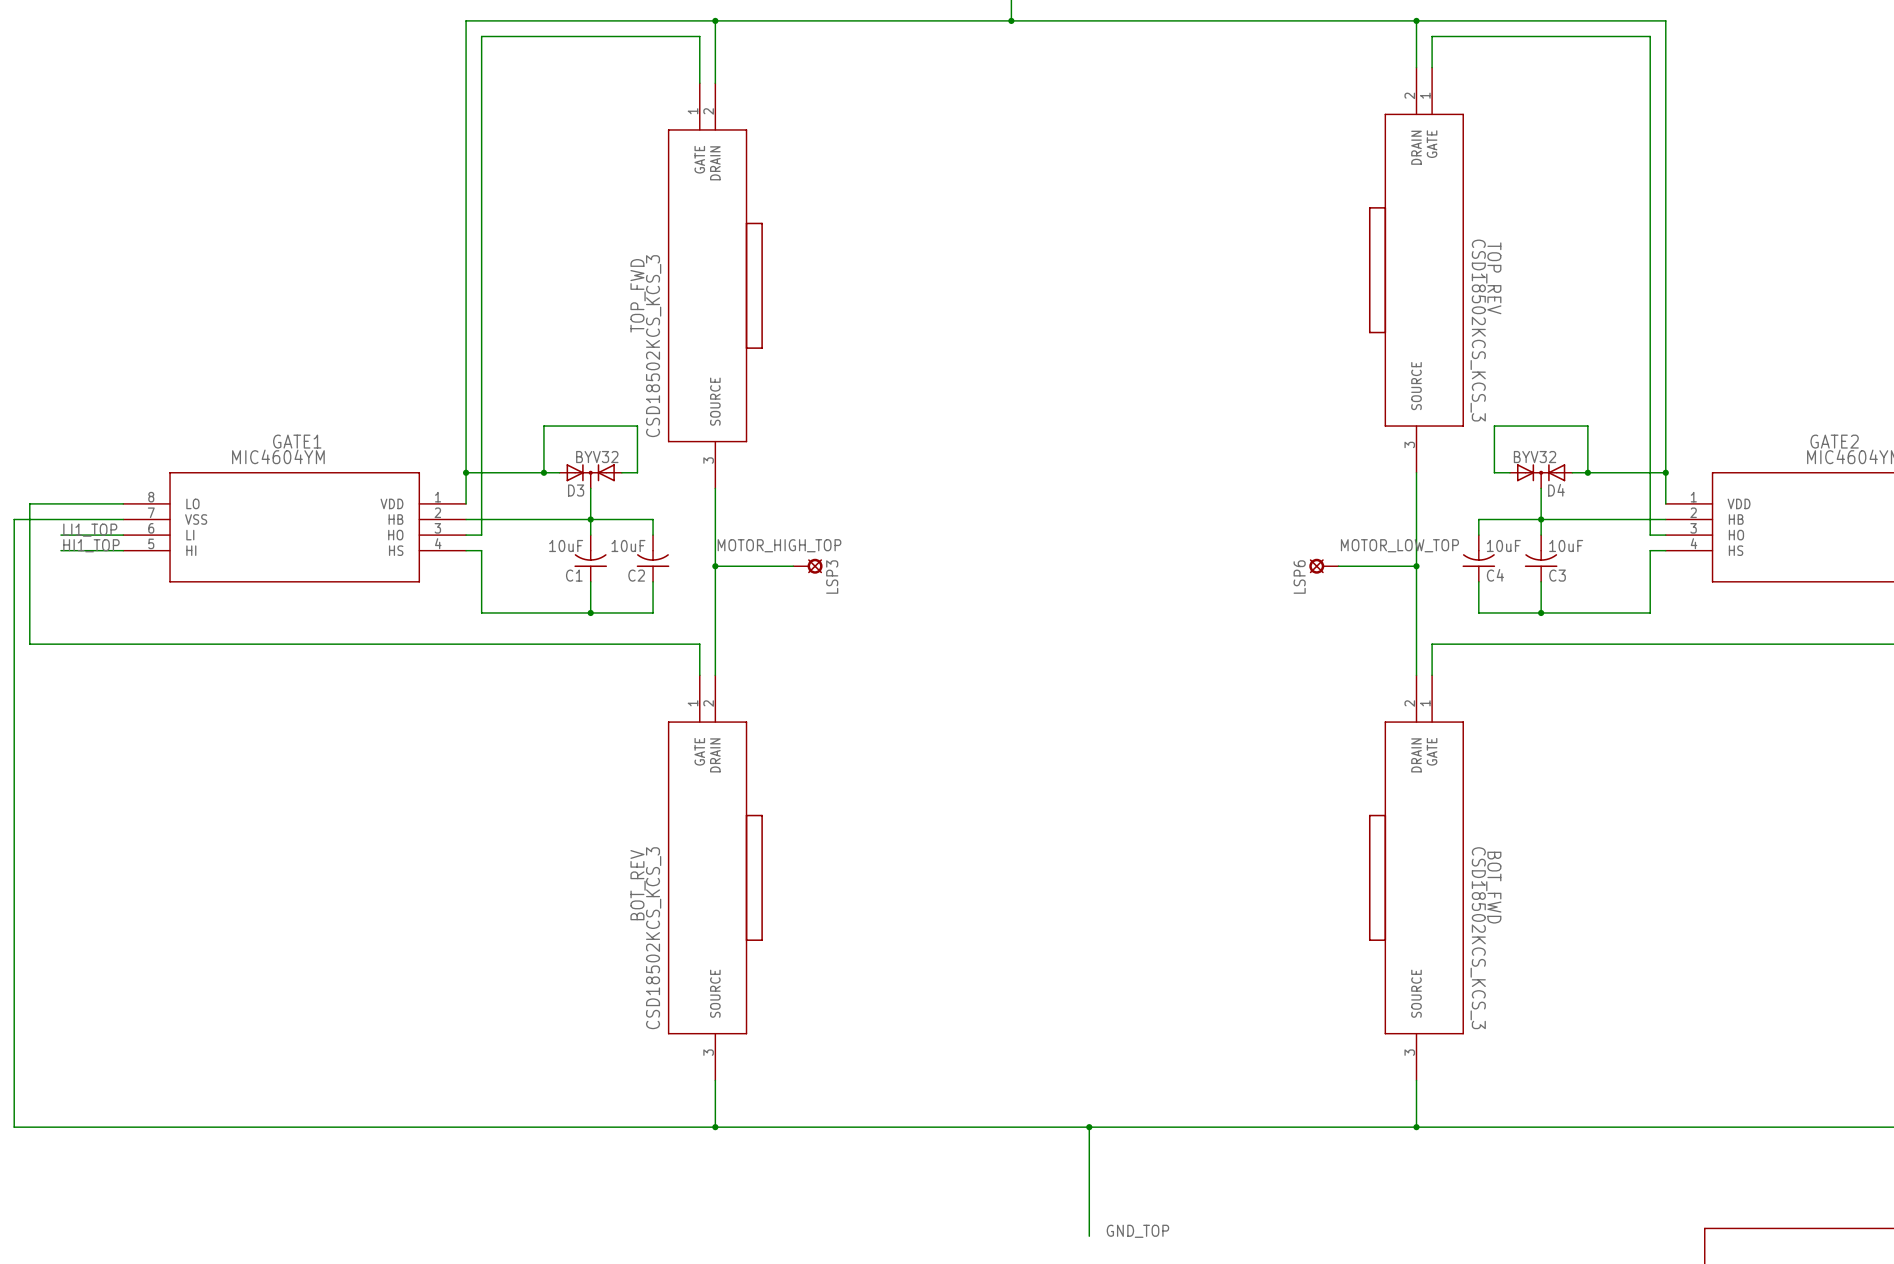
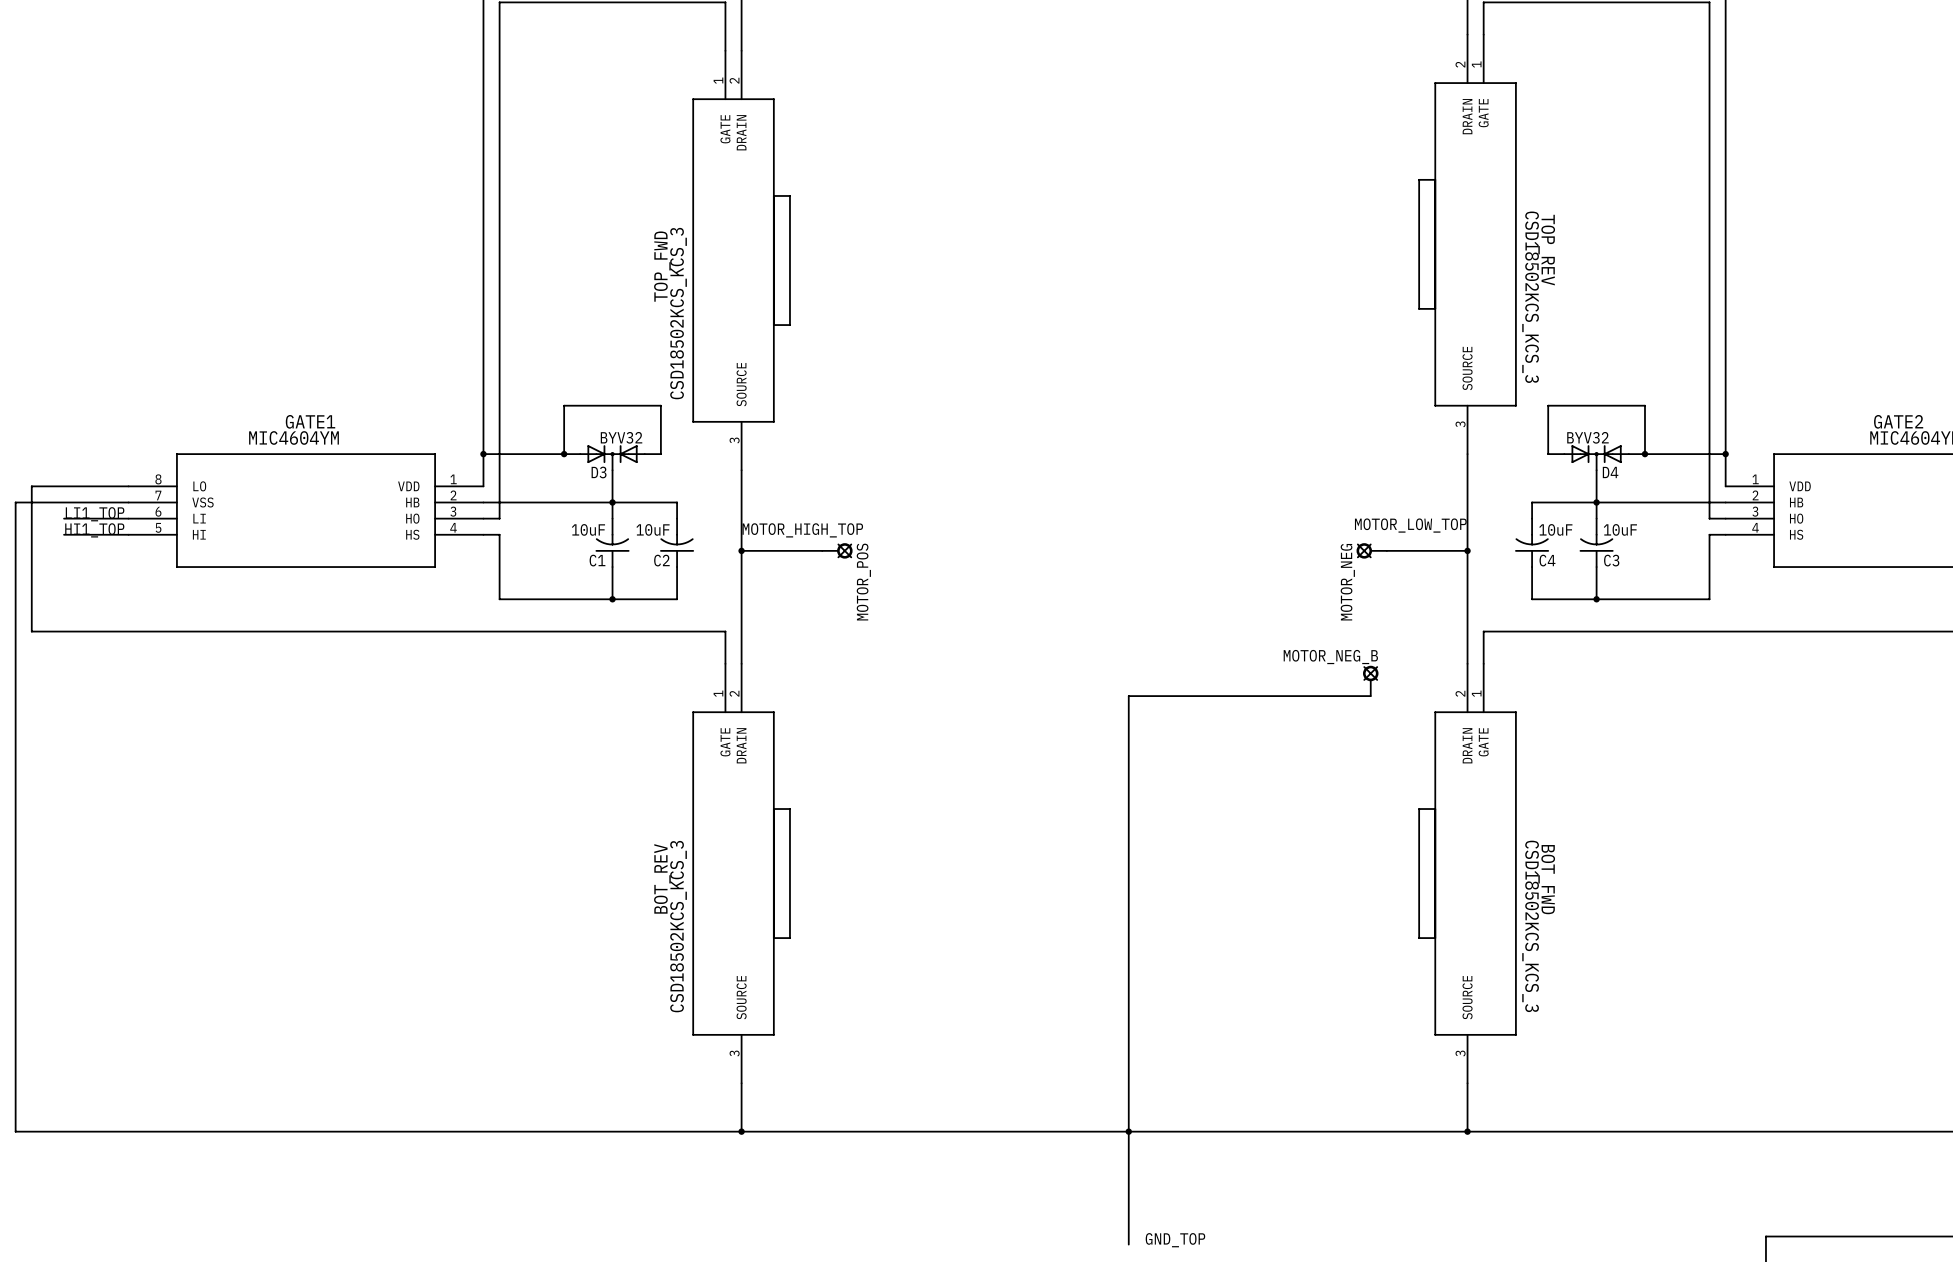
label position: MOTOR_LOW_TOP (1399, 545) -> MOTOR_LOW_TOP (1410, 525)
LSP3 name: LSP3 (832, 577) -> MOTOR_POS (863, 582)
LSP6 name: LSP6 (1299, 577) -> MOTOR_NEG (1347, 582)
MOTOR_NEG_B: none -> (1370, 680)
wire: none -> (1370, 696) (1128, 696) (1128, 1131)

